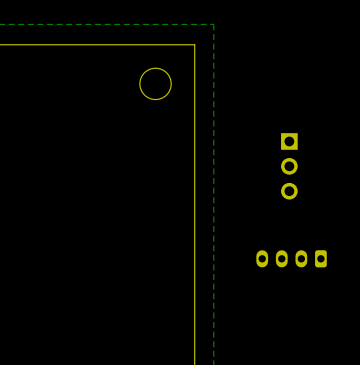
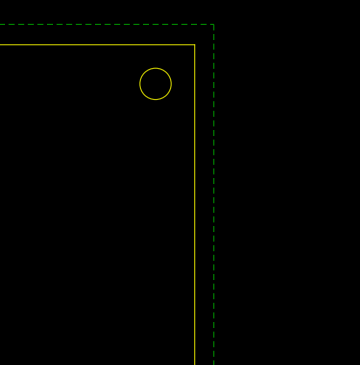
part: (289, 166) -> none
part: (291, 258) -> none

